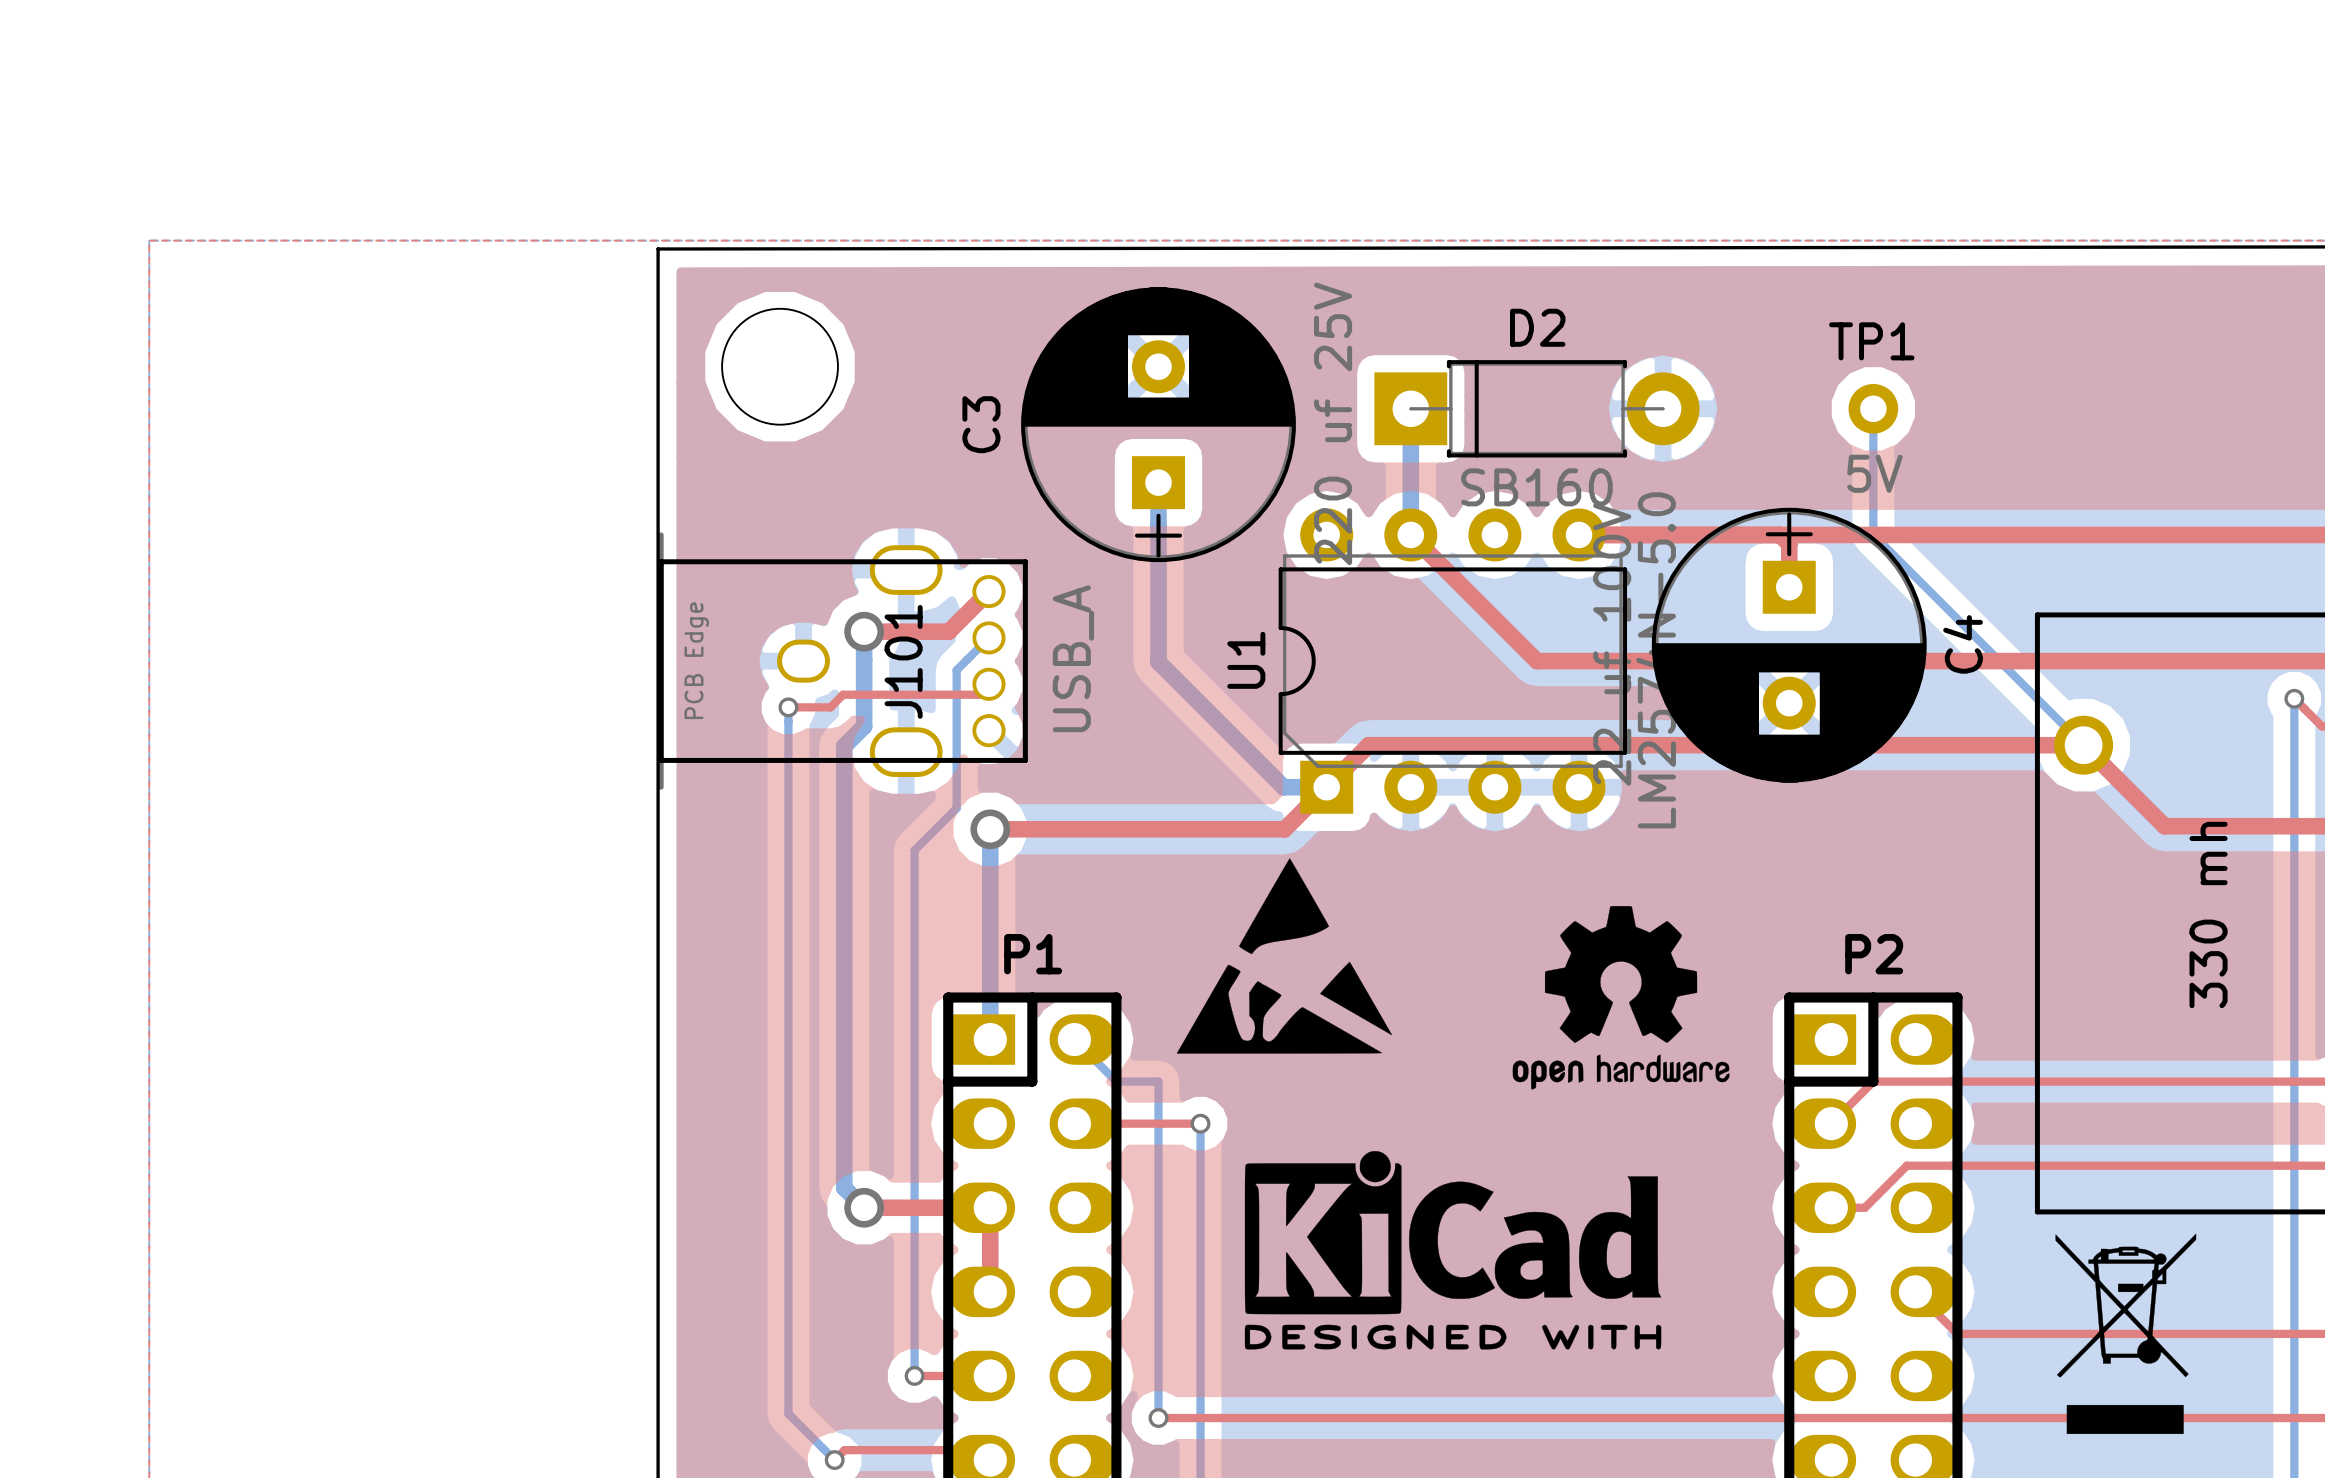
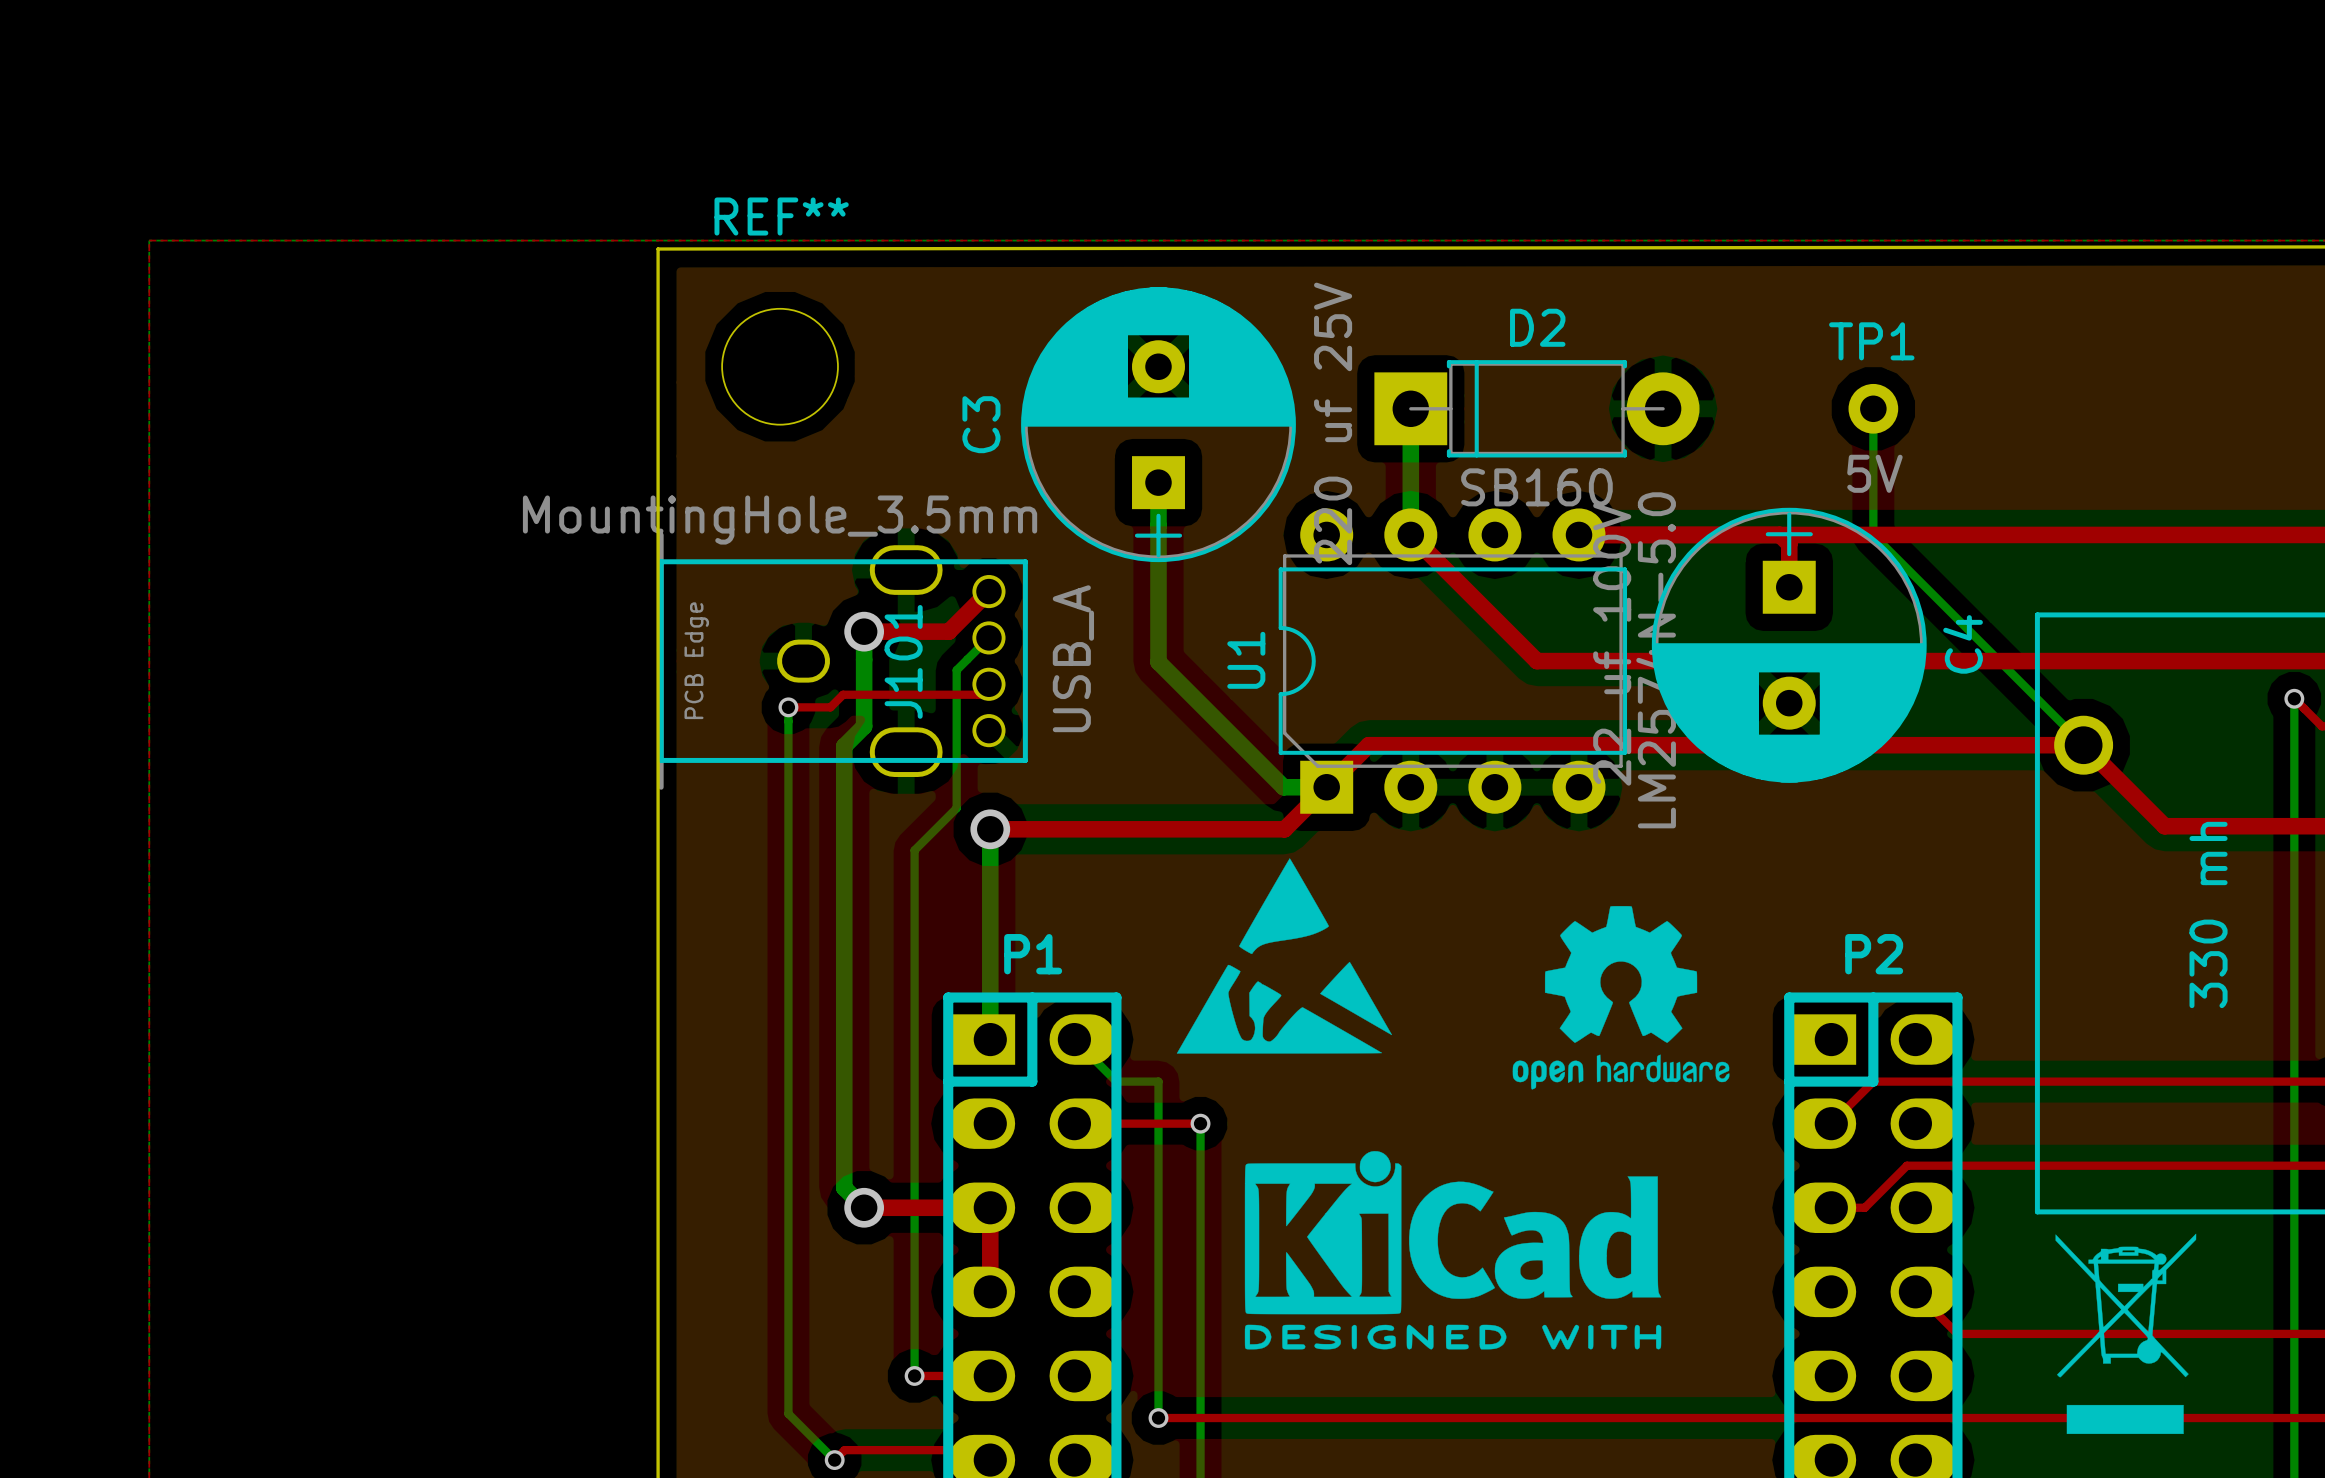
REF** name: none -> REF** (781, 216)
REF** value: none -> MountingHole_3.5mm (780, 520)

